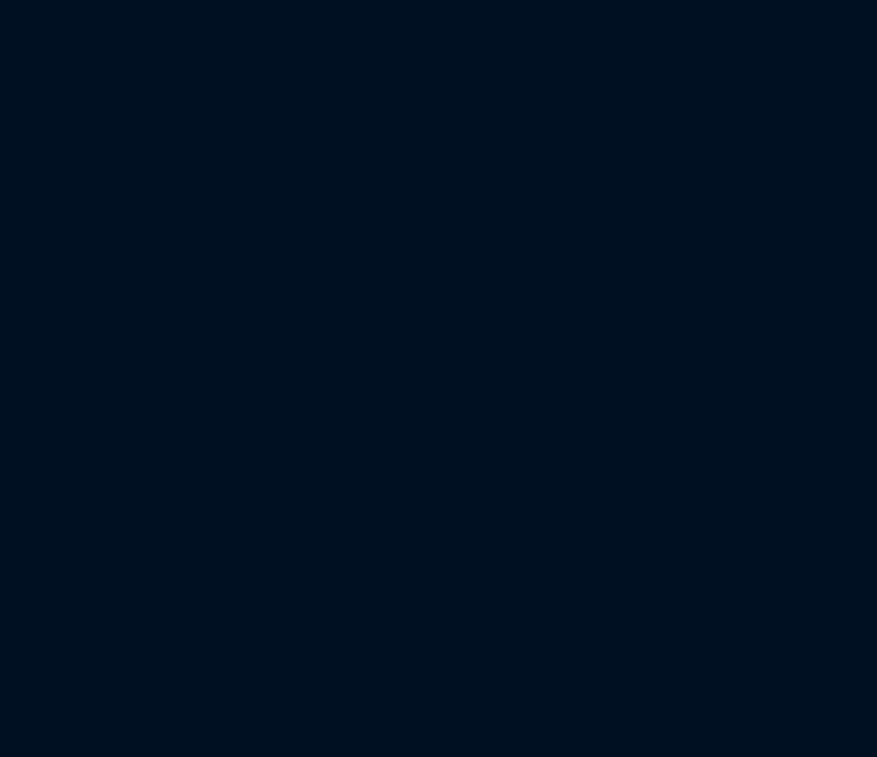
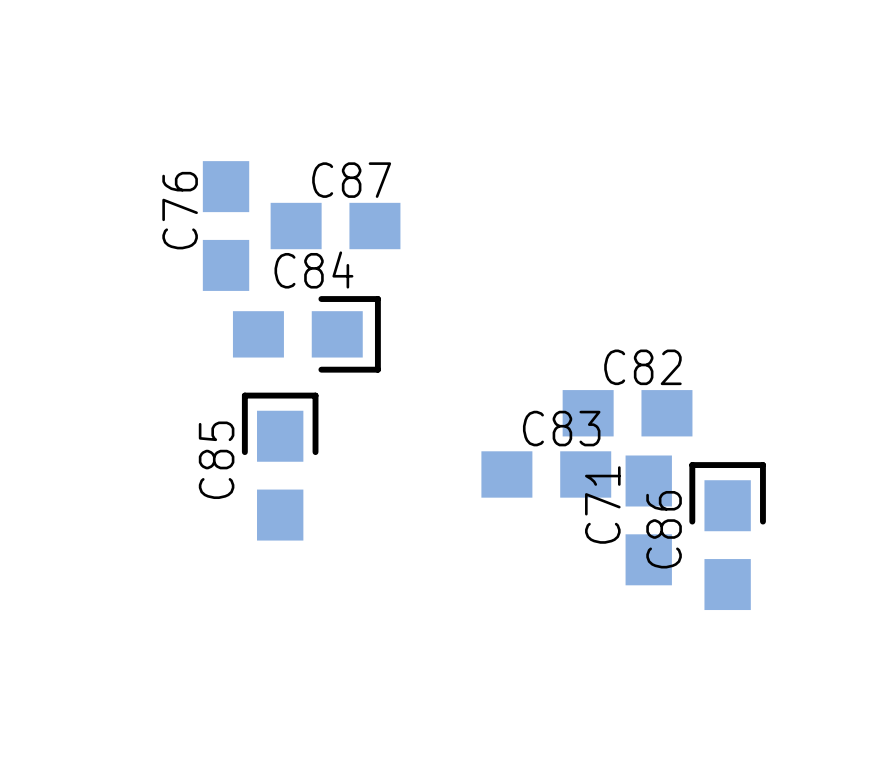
C76: none -> (226, 226)
C87: none -> (335, 226)
C84: none -> (306, 334)
C82: none -> (627, 413)
C85: none -> (280, 466)
C83: none -> (546, 474)
C71: none -> (648, 520)
C86: none -> (727, 536)

